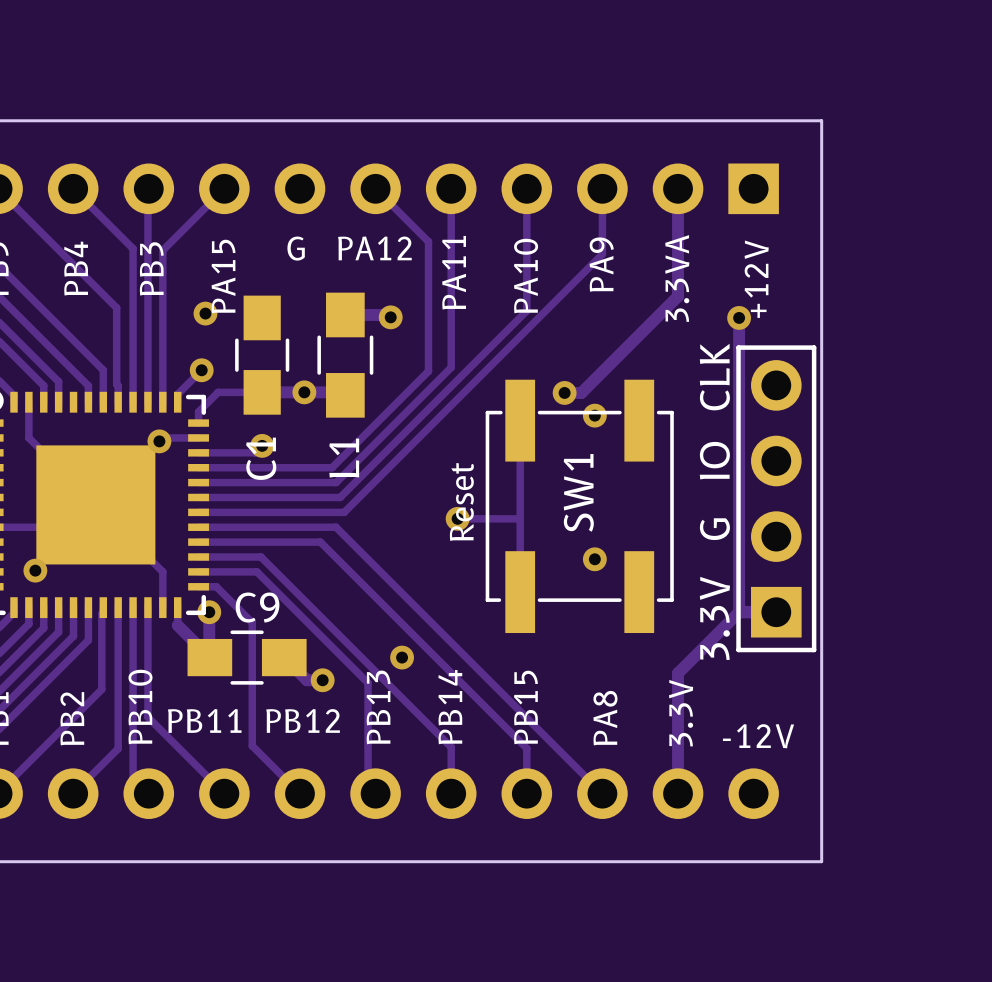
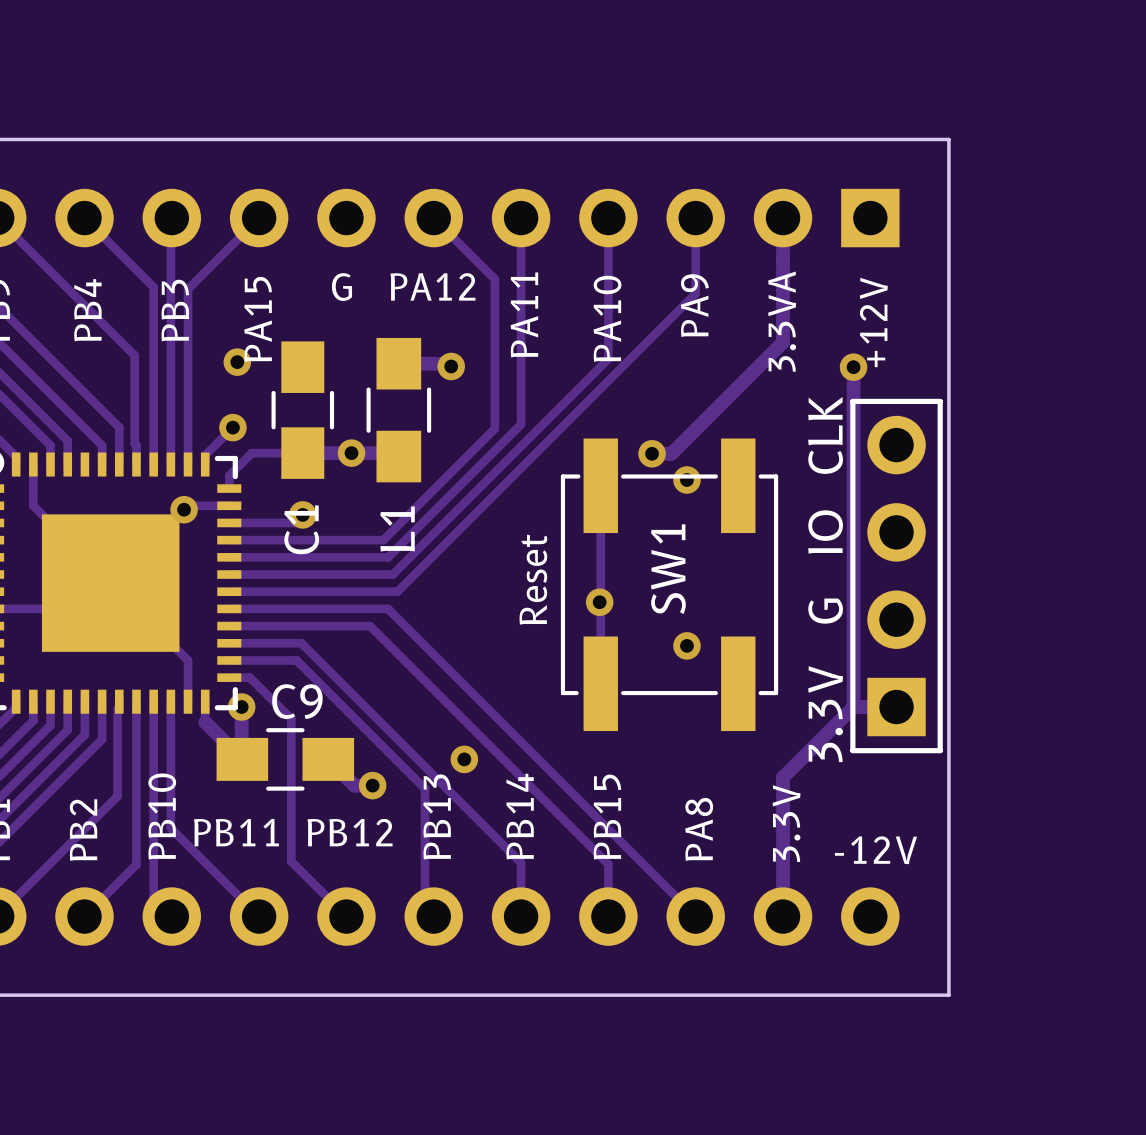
track: (457, 518) (520, 518) -> none
via position: (457, 518) -> (599, 602)
via: (35, 570) -> none

